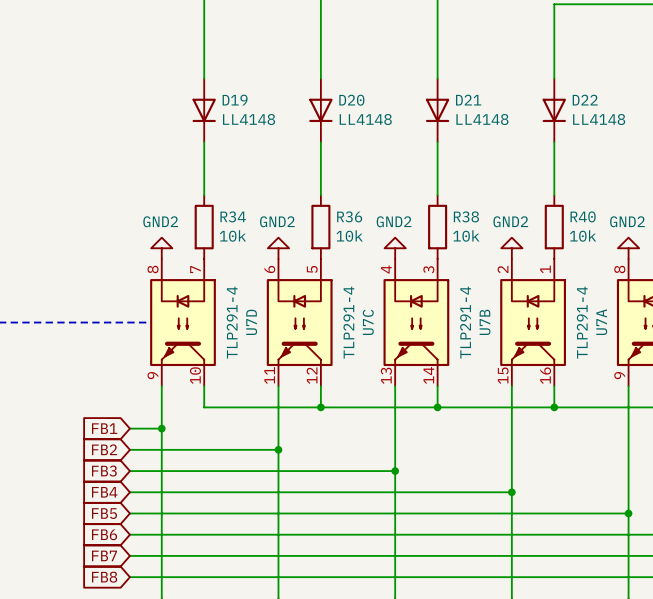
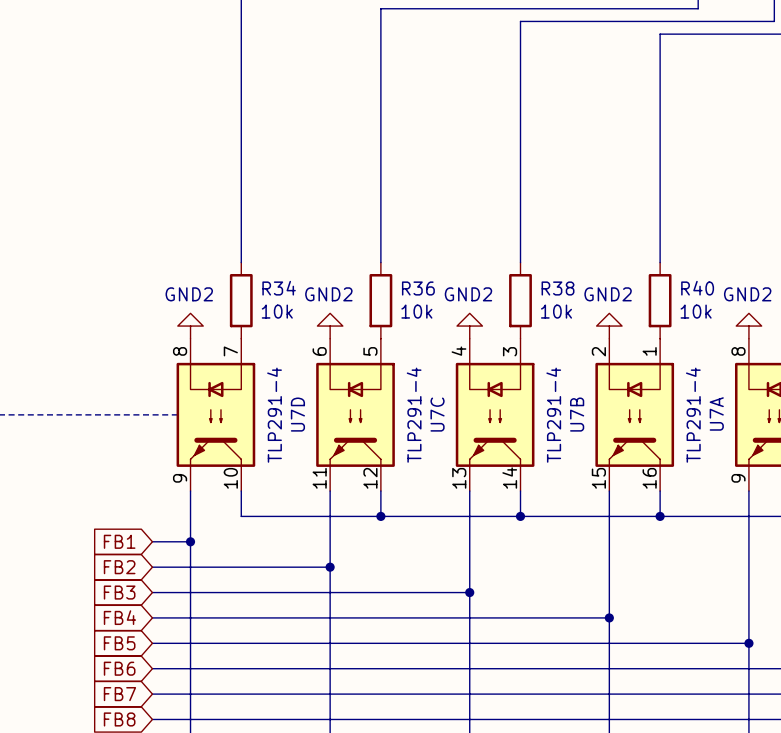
D19: LL4148 (204, 110) -> none
D20: LL4148 (320, 110) -> none
D21: LL4148 (437, 110) -> none
D22: LL4148 (554, 110) -> none

